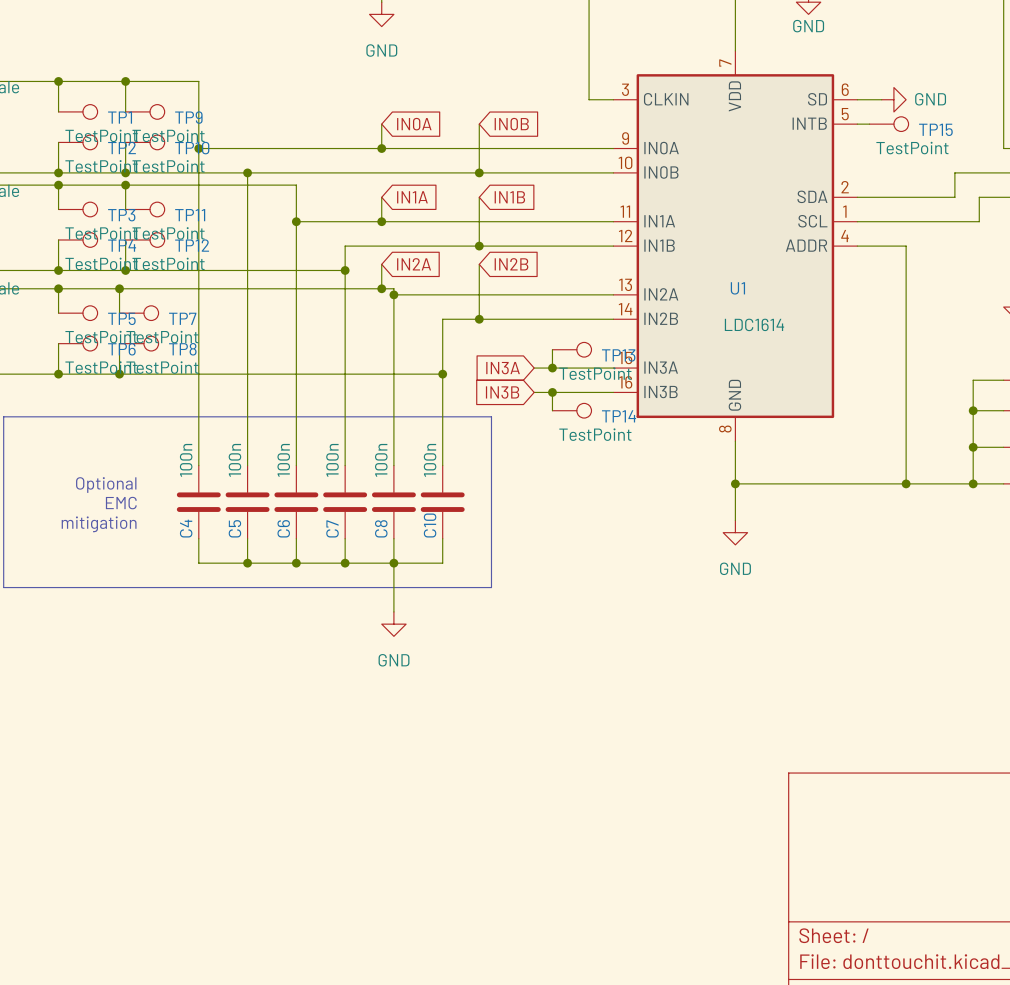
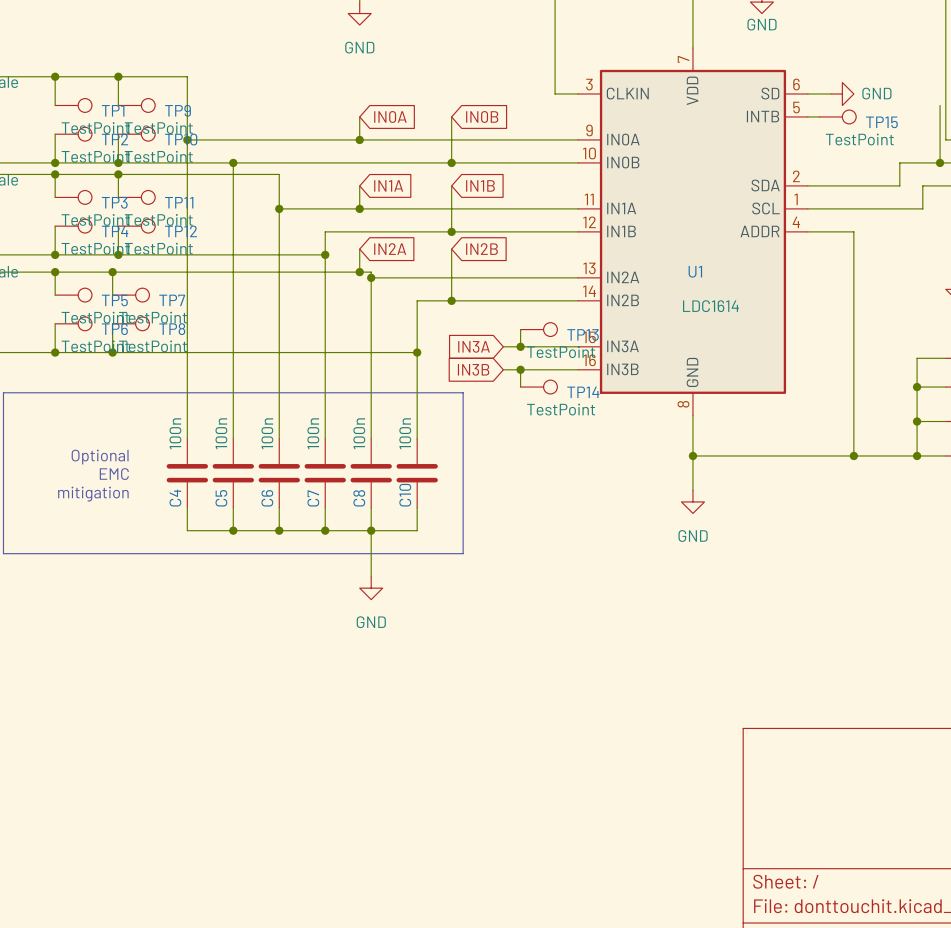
wire: none -> (940, 105) (940, 162)
junction: none -> (940, 162)

